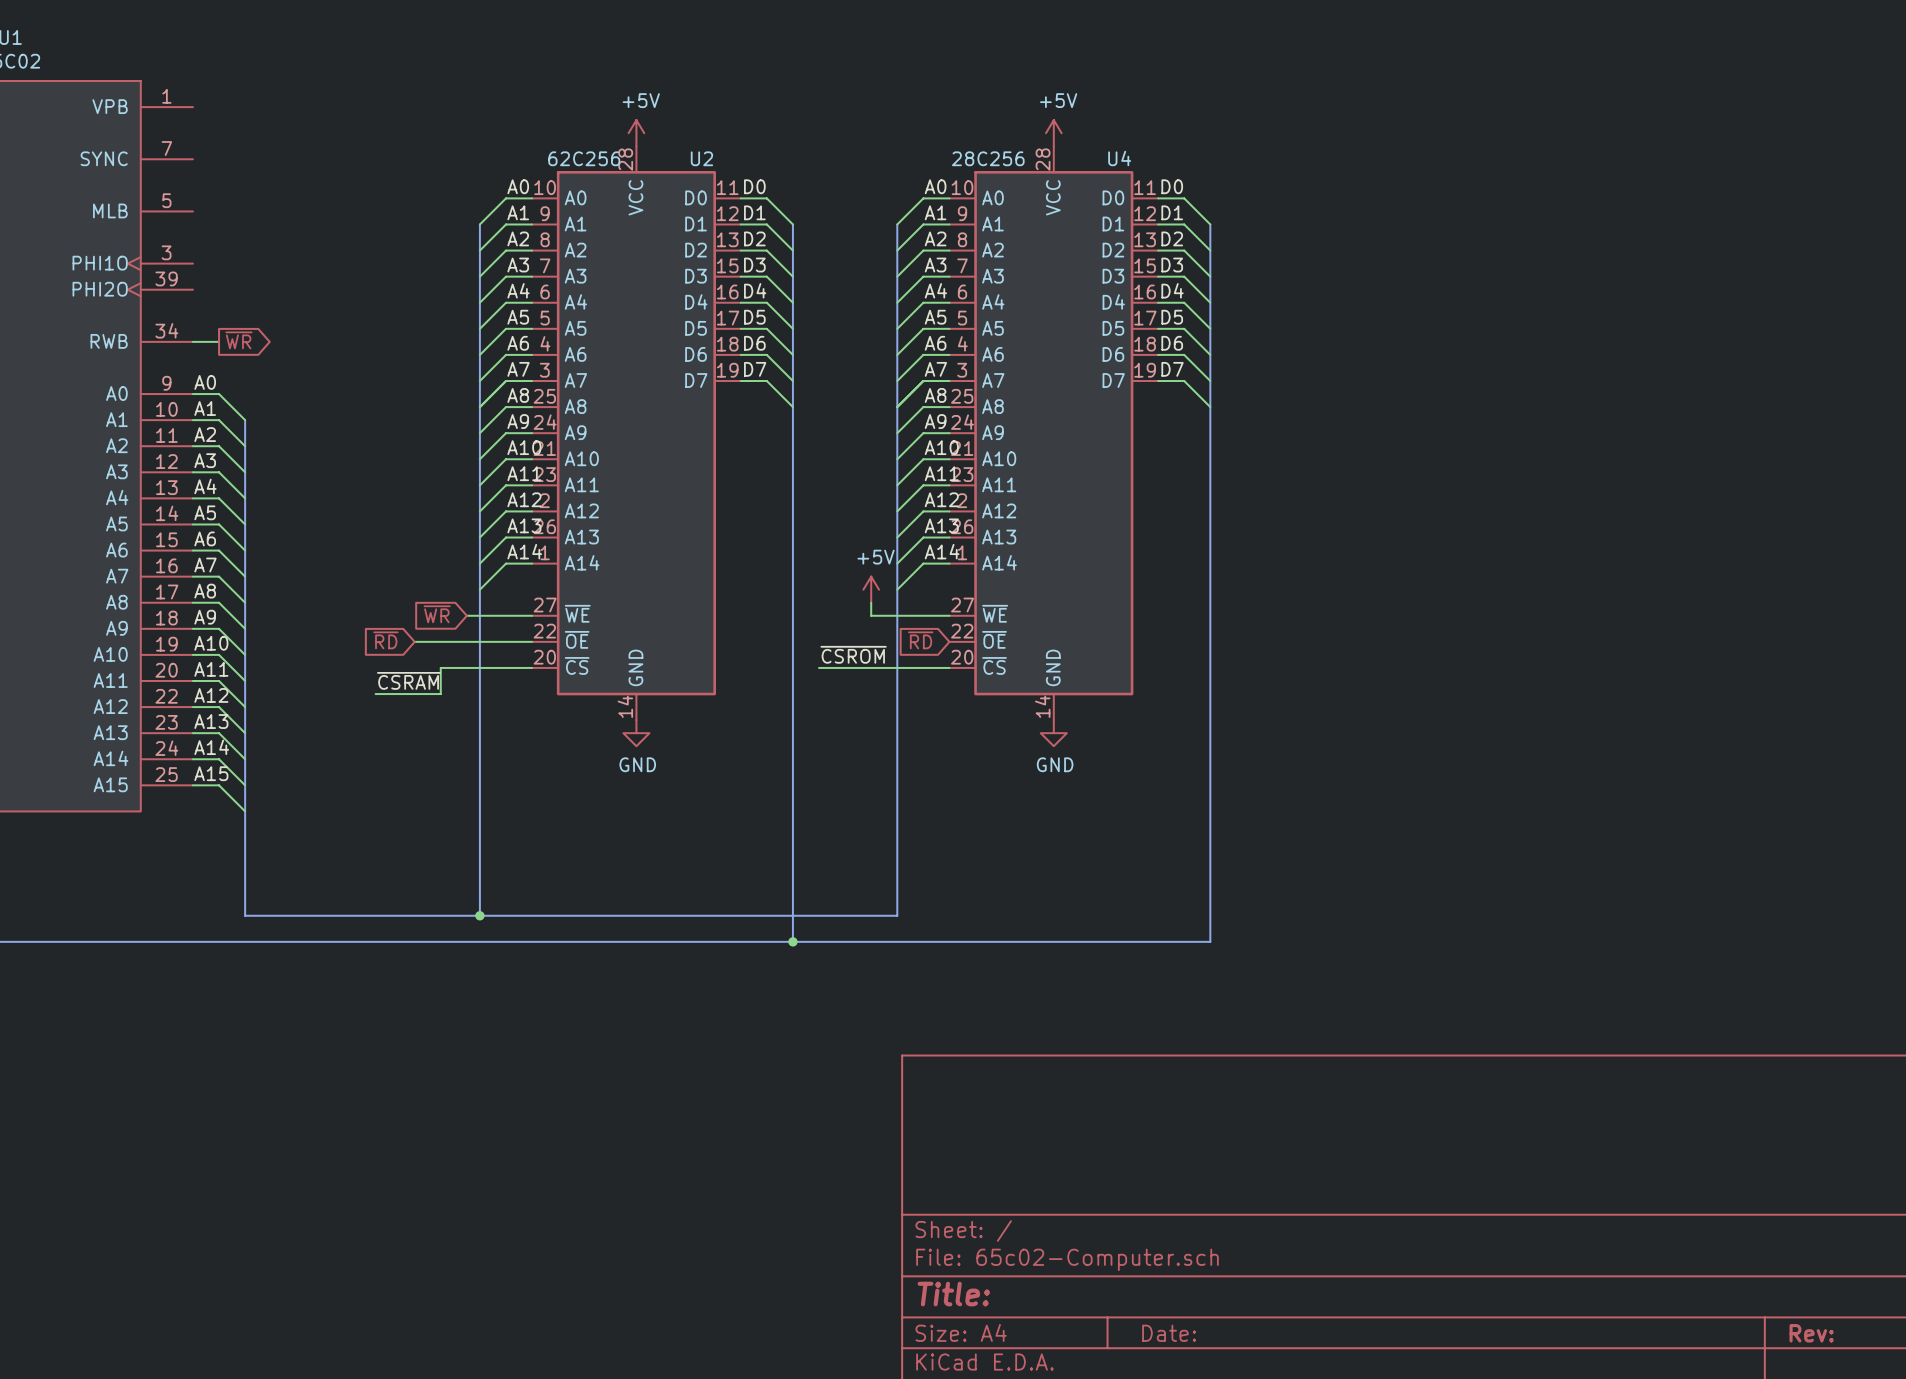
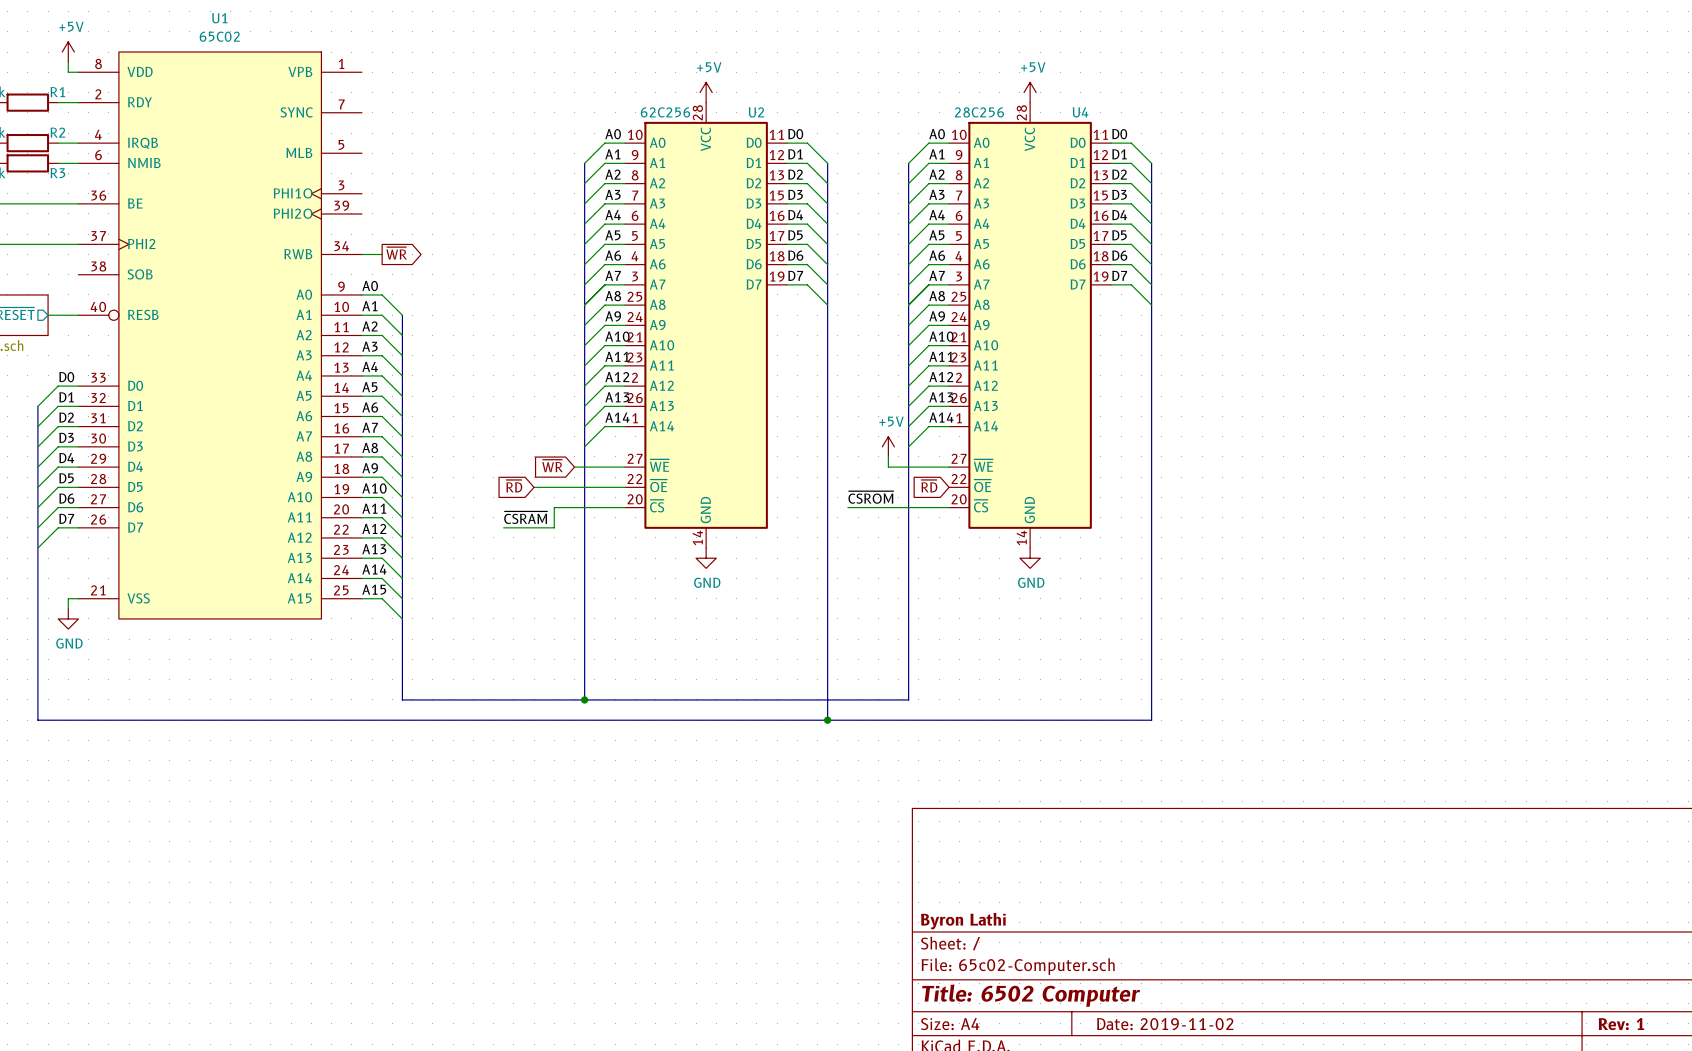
title block: none -> Byron Lathi (963, 921)
title block: Title: (953, 1294) -> Title: 6502 Computer (1031, 995)
title block: Date: (1169, 1333) -> Date: 2019-11-02 (1165, 1024)
title block: Rev: (1811, 1333) -> Rev: 1 (1621, 1024)

